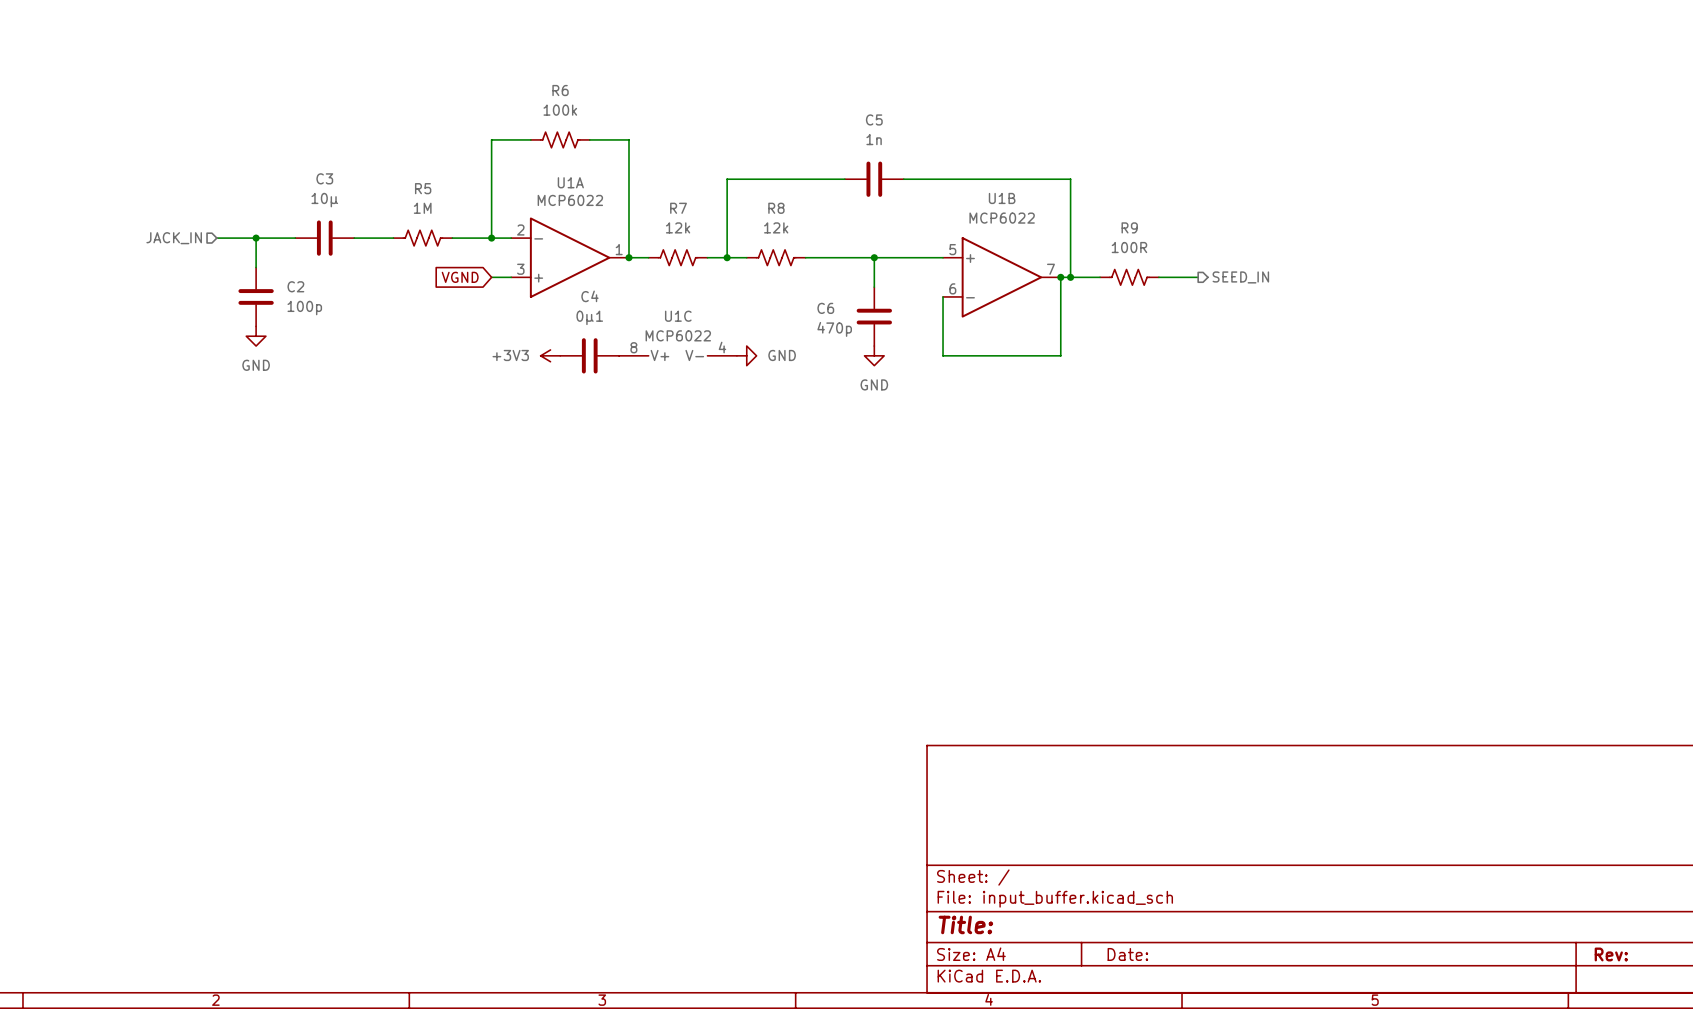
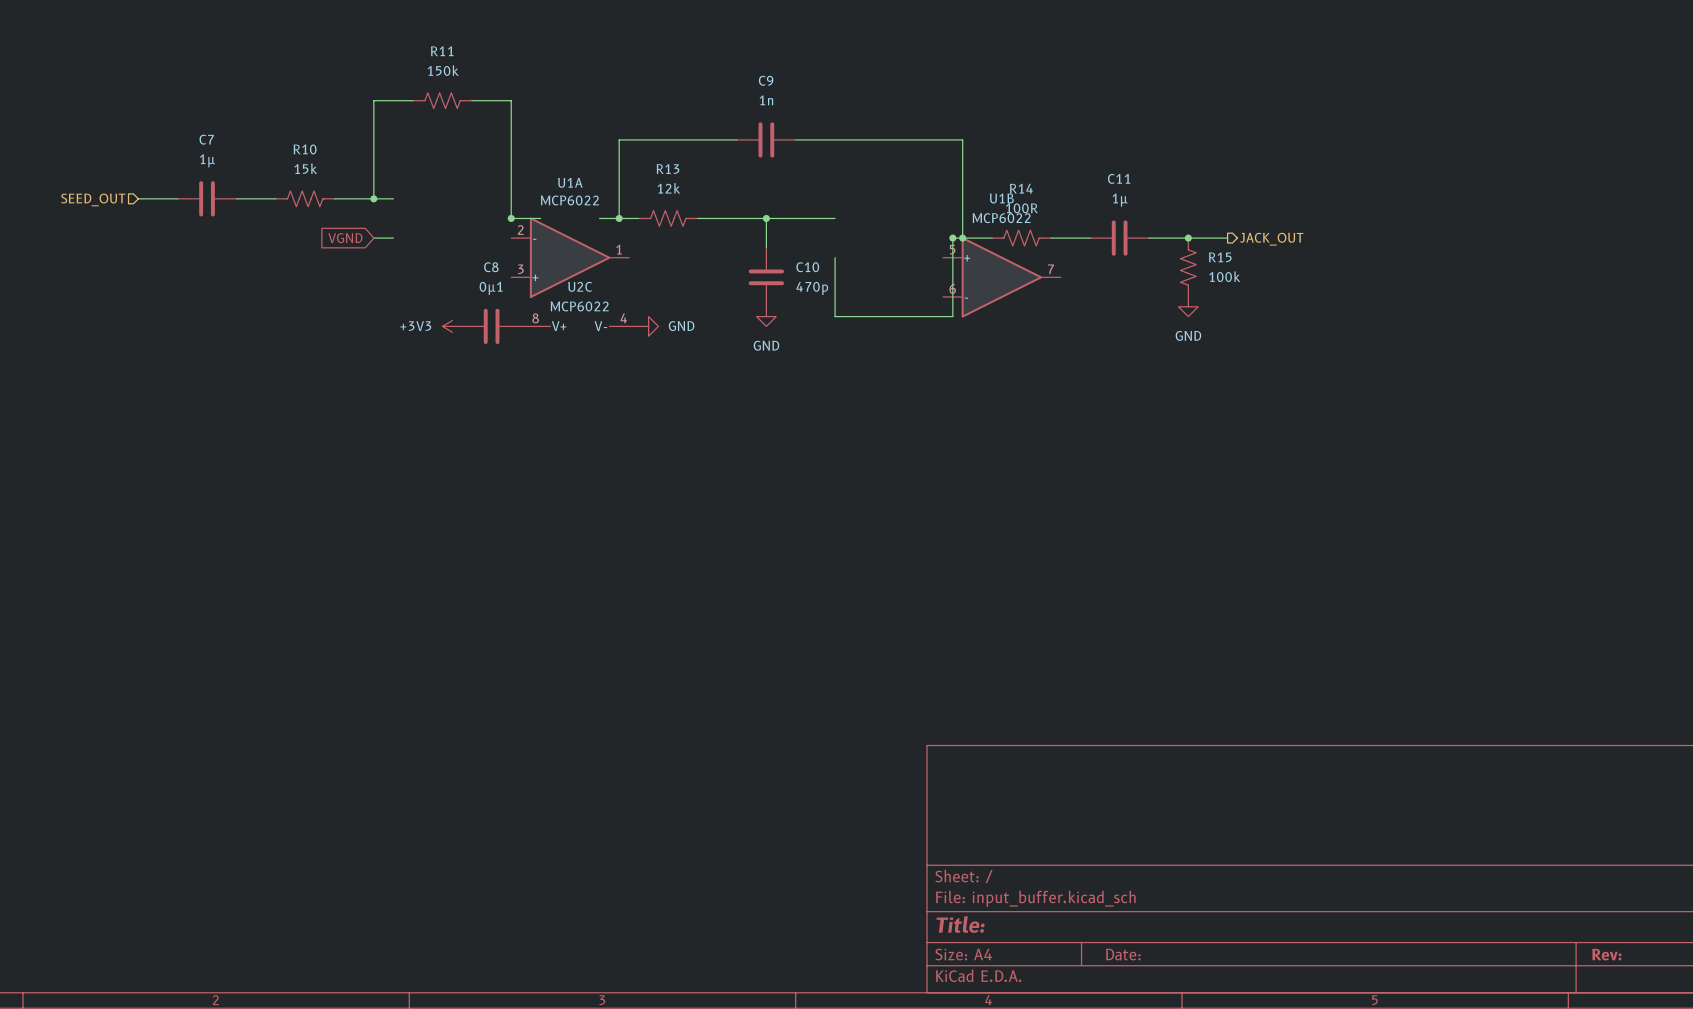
R11: none -> 150k (442, 100)
wire: none -> (471, 100) (511, 100) (511, 218) (540, 218)
wire: (530, 139) (491, 139) (491, 238) -> (413, 100) (373, 100) (373, 198)
R6: 100k (560, 139) -> none
wire: (589, 139) (619, 139) -> (619, 218) (619, 139)
wire: (628, 139) (628, 257) (648, 257) -> (628, 139) (736, 139)
C9: none -> 1n (766, 139)
wire: (844, 179) (727, 179) (727, 257) -> none
C5: 1n (874, 179) -> none
wire: (903, 179) (1070, 179) (1070, 277) -> (795, 139) (962, 139) (962, 238)
hierarchical label: none -> SEED_OUT (93, 199)
wire: none -> (138, 198) (177, 198)
C7: none -> 1µ (207, 198)
wire: none -> (236, 198) (275, 198)
R10: none -> 15k (305, 198)
junction: none -> (373, 198)
R13: none -> 12k (668, 218)
junction: none -> (766, 218)
hierarchical label: JACK_IN (174, 238) -> none
wire: (216, 238) (295, 238) -> none
wire: (256, 238) (256, 267) -> none
junction: (256, 238) -> none
C3: 10µ (324, 238) -> none
wire: (354, 238) (373, 238) -> none
R5: 1M (422, 238) -> none
wire: (452, 238) (511, 238) -> (334, 198) (393, 198)
junction position: (491, 238) -> (511, 218)
junction: none -> (952, 238)
junction: none -> (962, 238)
R14: none -> 100R (1021, 238)
C11: none -> 1µ (1119, 238)
wire: none -> (1149, 238) (1227, 238)
junction: none -> (1188, 238)
hierarchical label: none -> JACK_OUT (1271, 239)
junction position: (628, 257) -> (619, 218)
R7: 12k (678, 257) -> none
wire: (707, 257) (746, 257) -> (599, 218) (638, 218)
junction: (727, 257) -> none
R8: 12k (776, 257) -> none
wire: (805, 257) (943, 257) -> (697, 218) (835, 218)
wire: (874, 257) (874, 287) -> (766, 218) (766, 247)
junction: (874, 257) -> none
R15: none -> 100k (1188, 267)
global label position: VGND (460, 277) -> VGND (345, 238)
wire: (491, 277) (511, 277) -> none
C10: none -> 470p (766, 277)
junction: (1060, 277) -> none
junction: (1070, 277) -> none
wire: (1100, 277) (1060, 277) (1060, 355) (943, 355) (943, 296) -> (992, 238) (952, 238) (952, 316) (835, 316) (835, 257)
R9: 100R (1129, 277) -> none
wire: (1158, 277) (1198, 277) -> (1050, 238) (1090, 238)
hierarchical label: SEED_IN (1240, 277) -> none
C2: 100p (256, 296) -> none
power symbol: none -> GND (1188, 306)
C6: 470p (874, 316) -> none
C8: none -> 0µ1 (491, 326)
U2C: none -> MCP6022 (579, 326)
power symbol: none -> GND (648, 326)
power symbol: GND (256, 336) -> none
power symbol position: +3V3 (550, 355) -> +3V3 (452, 326)
C4: 0µ1 (589, 355) -> none
U1C: MCP6022 (678, 355) -> none
power symbol rotation: 0° (746, 355) -> 90° clockwise (766, 316)
power symbol position: GND (746, 355) -> GND (766, 316)
power symbol: GND (874, 355) -> none

